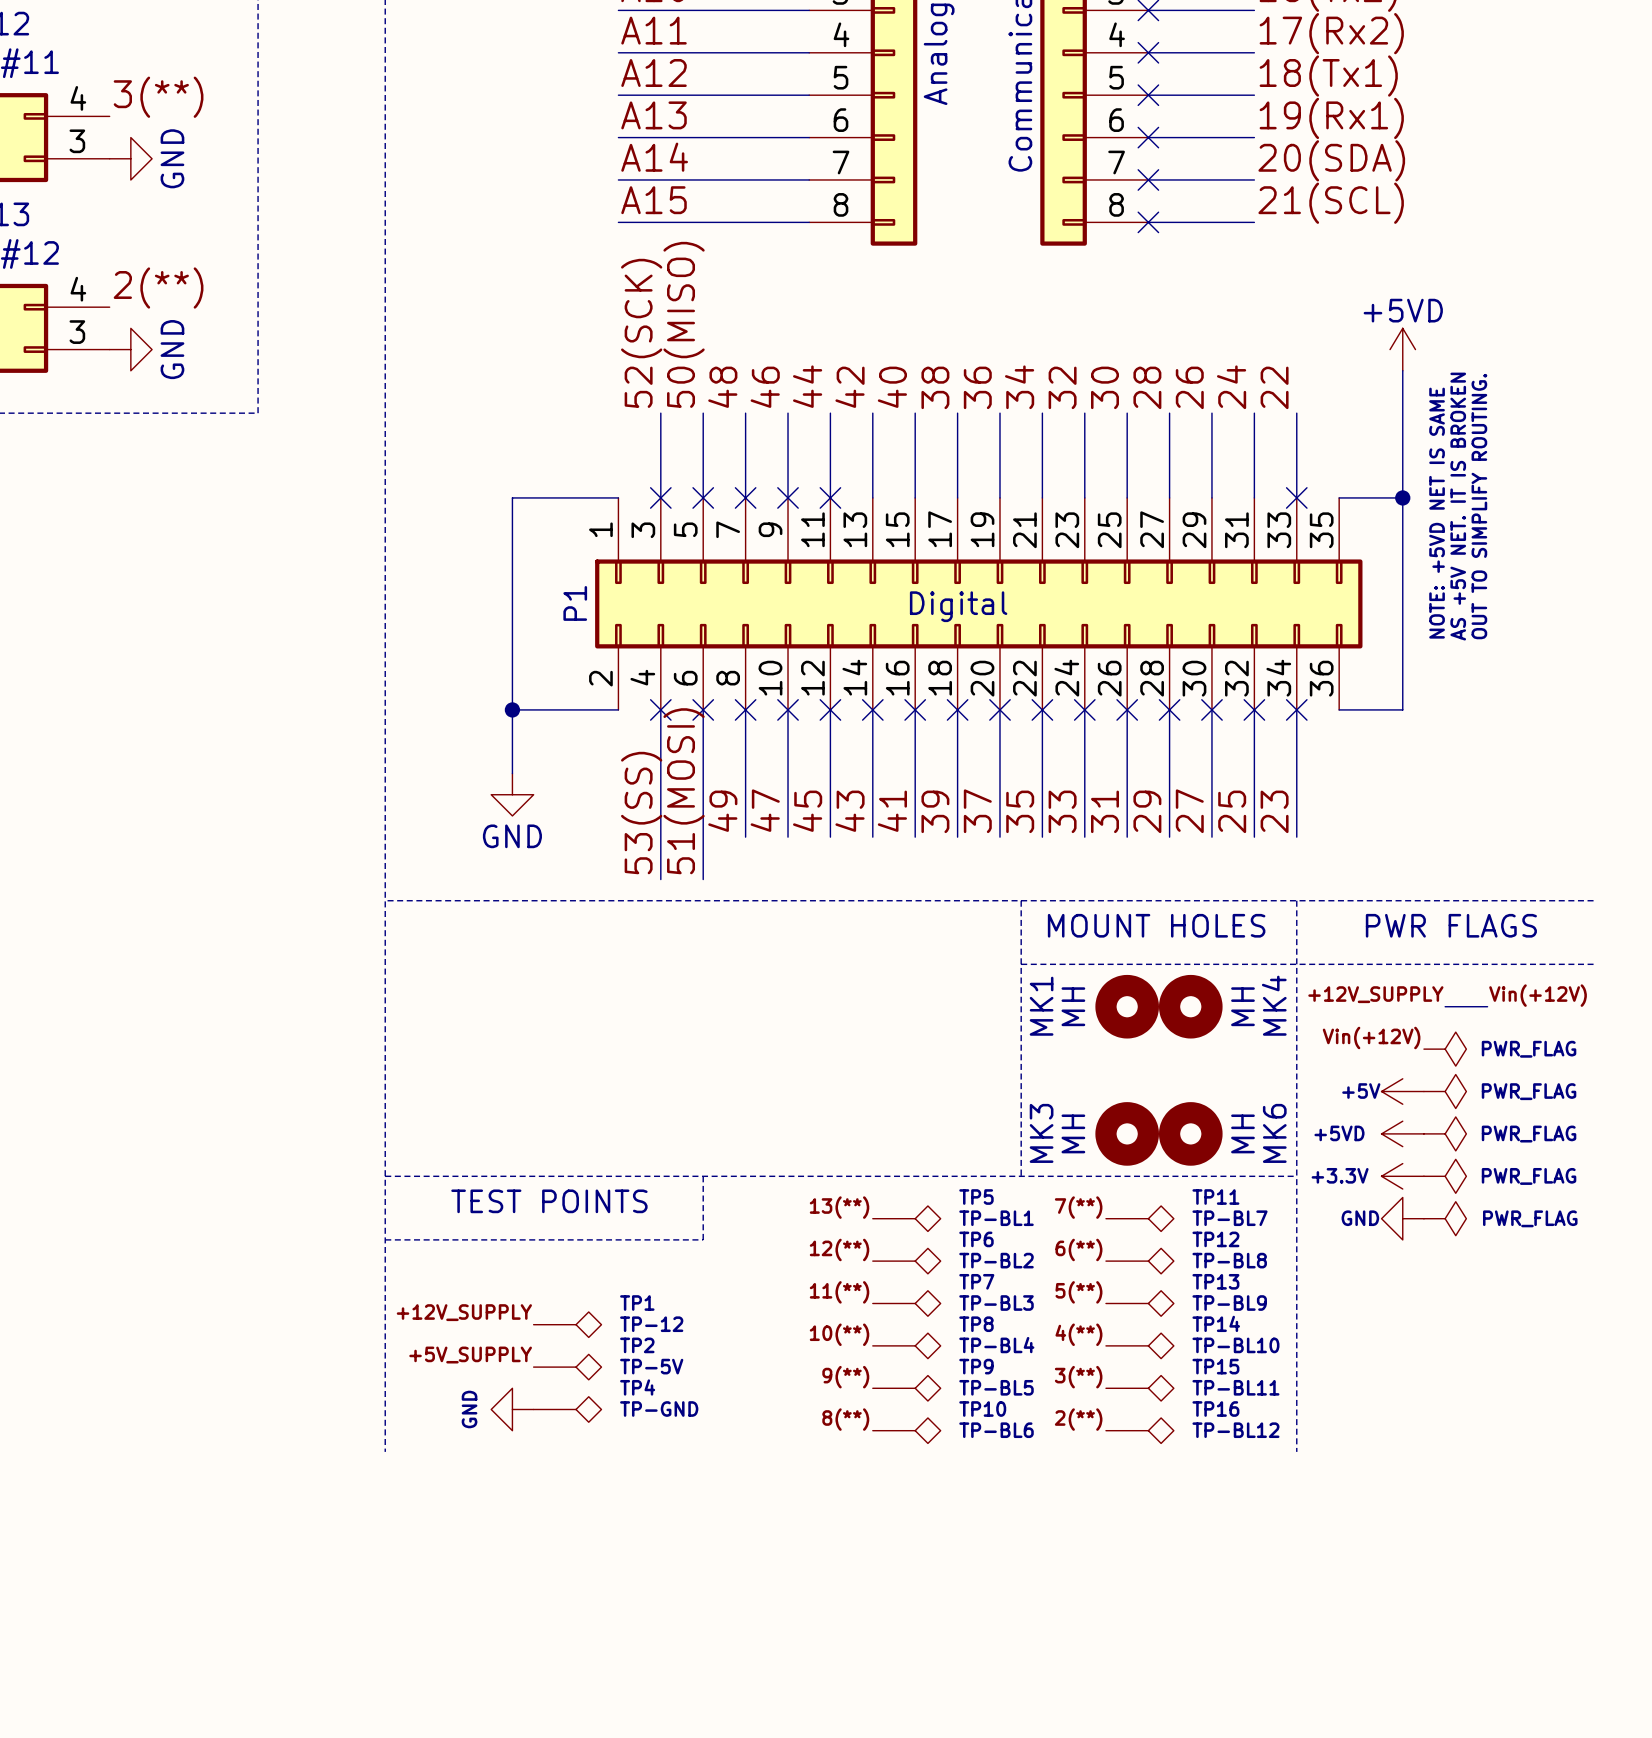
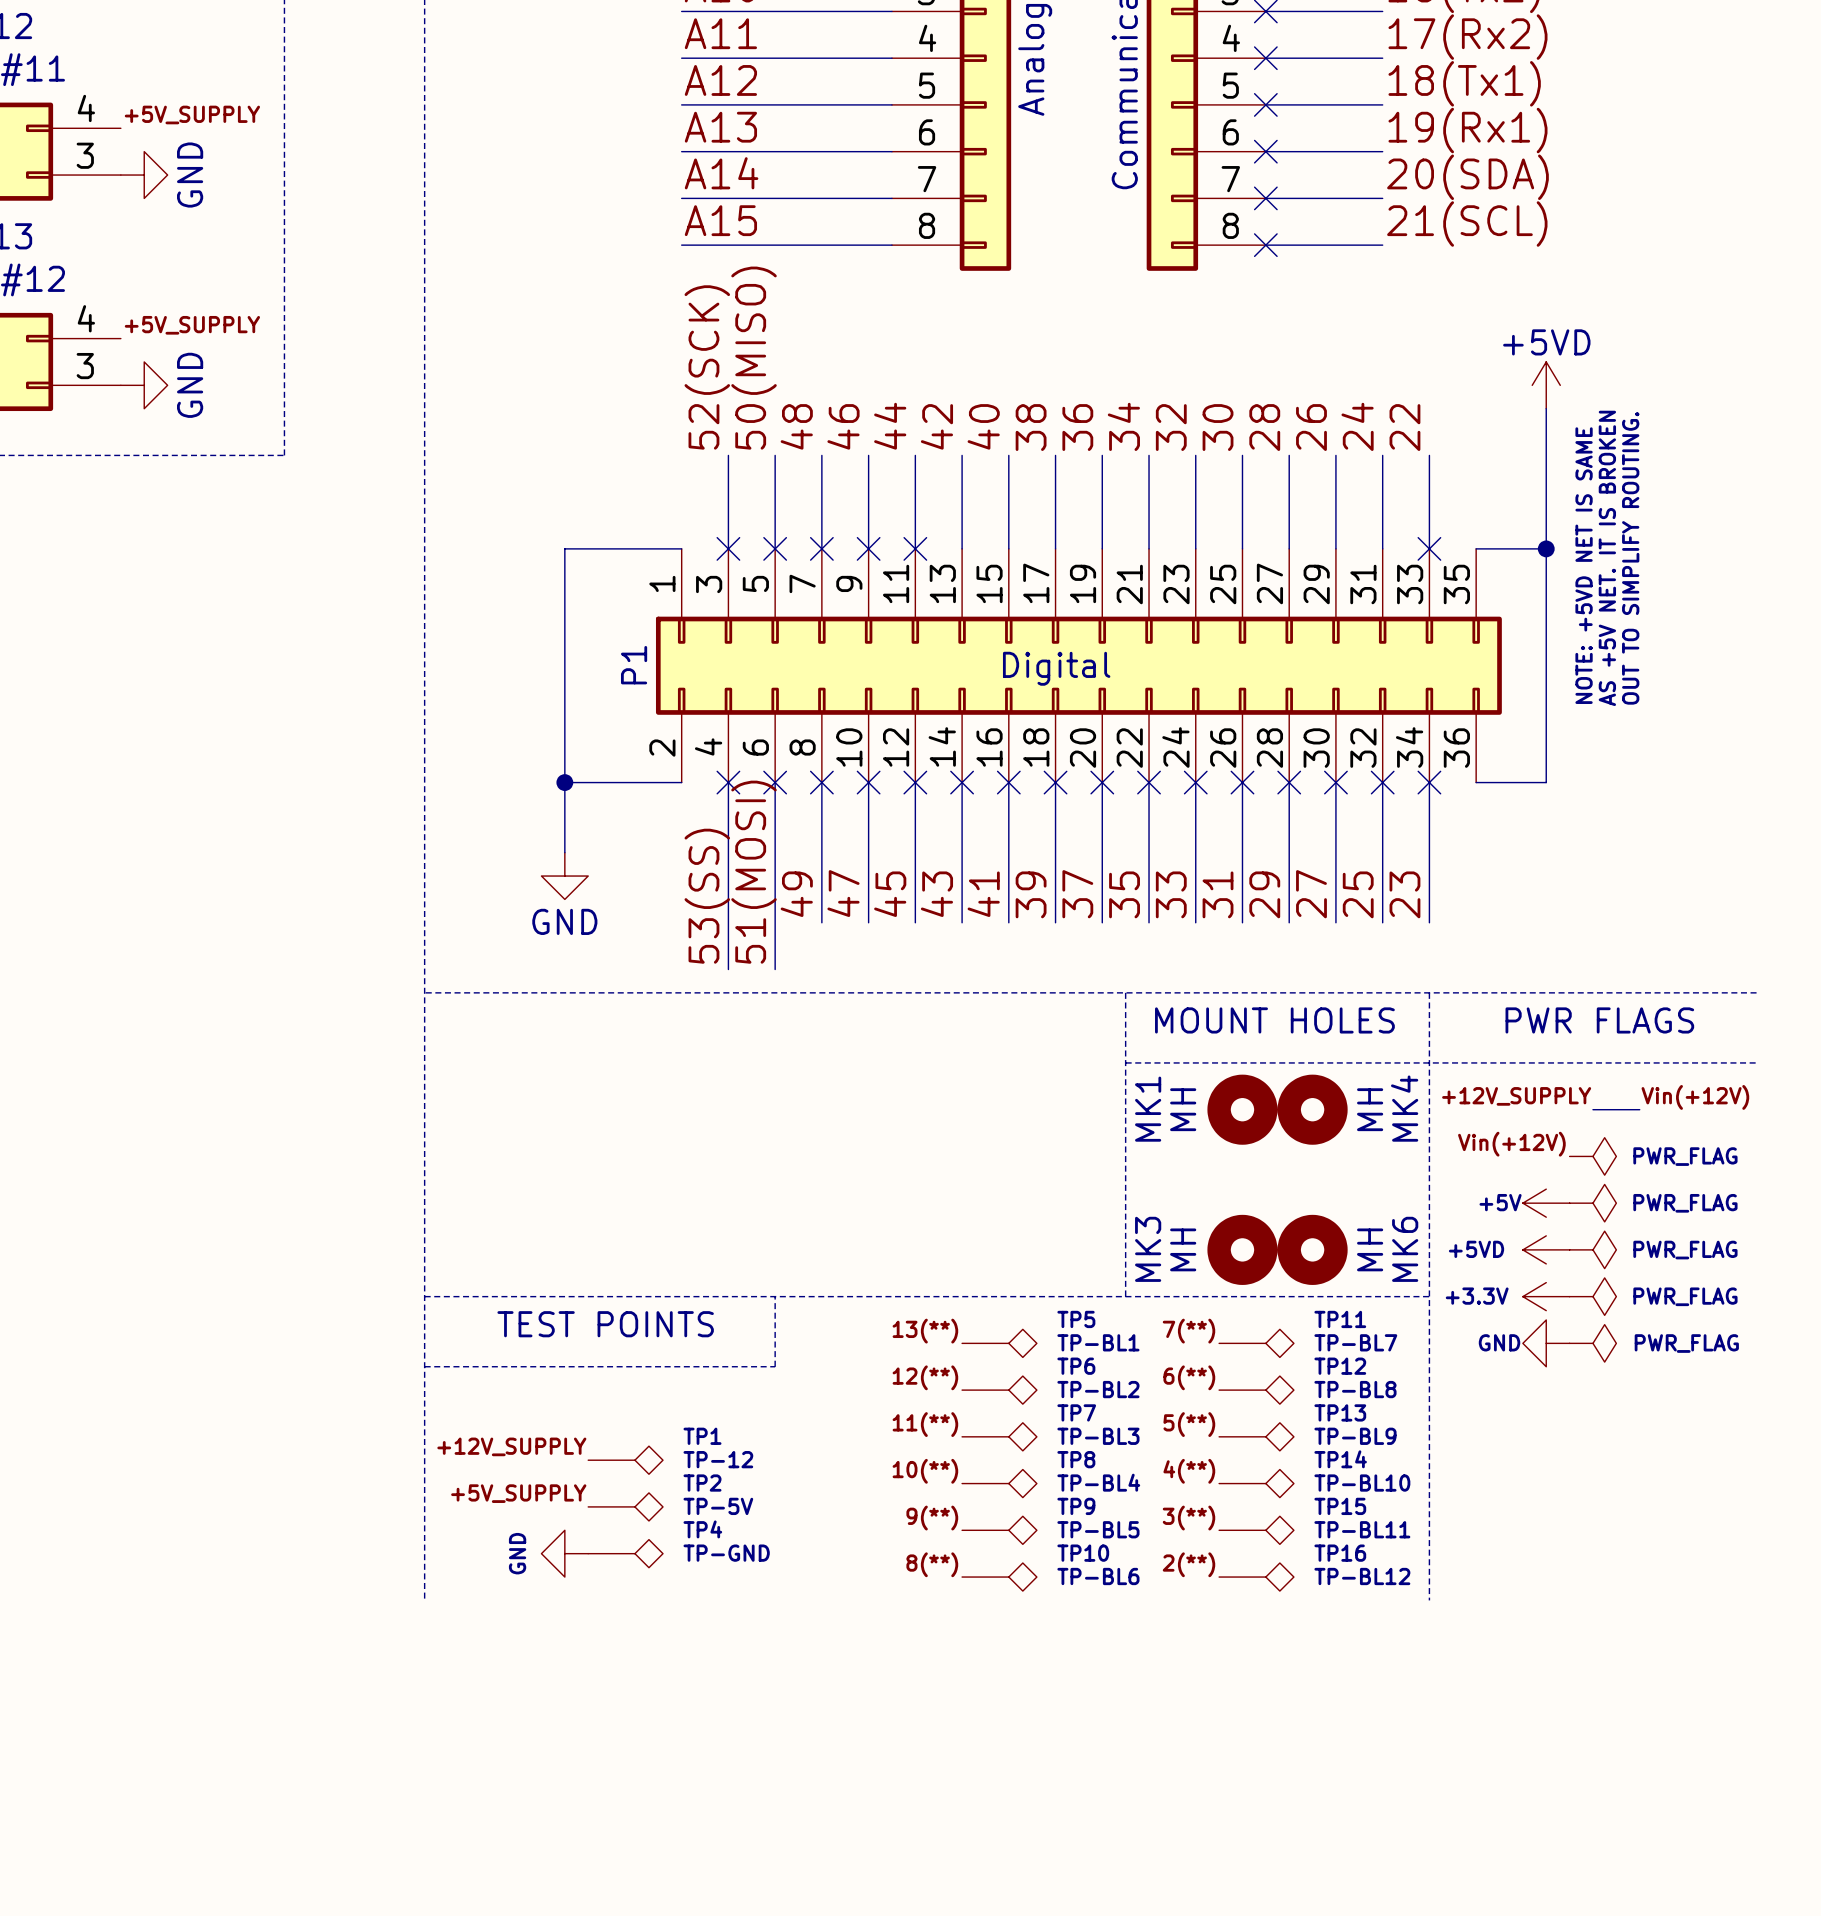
label: 3(**) (158, 97) -> +5V_SUPPLY (192, 114)
label: 2(**) (158, 288) -> +5V_SUPPLY (192, 325)

